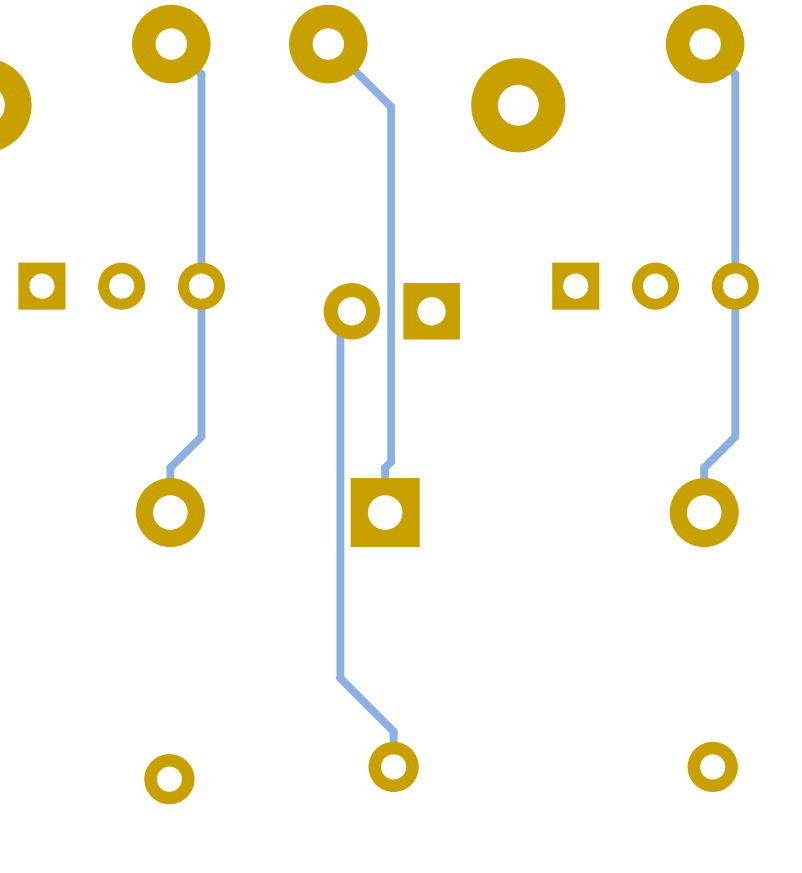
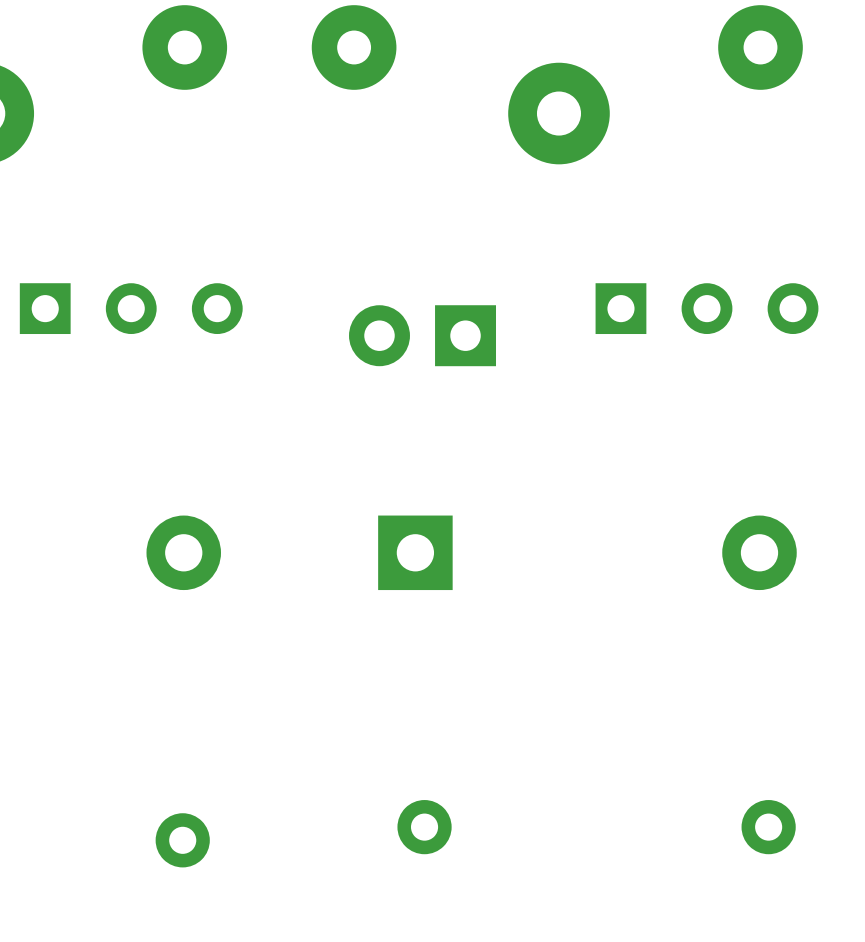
track: (171, 44) (201, 74) (201, 436) (170, 467) (170, 512) -> none
track: (328, 44) (391, 106) (391, 461) (385, 467) (385, 512) -> none
track: (705, 44) (735, 74) (735, 436) (704, 467) (704, 512) -> none
track: (351, 311) (340, 322) (340, 678) (393, 731) (393, 766) -> none

